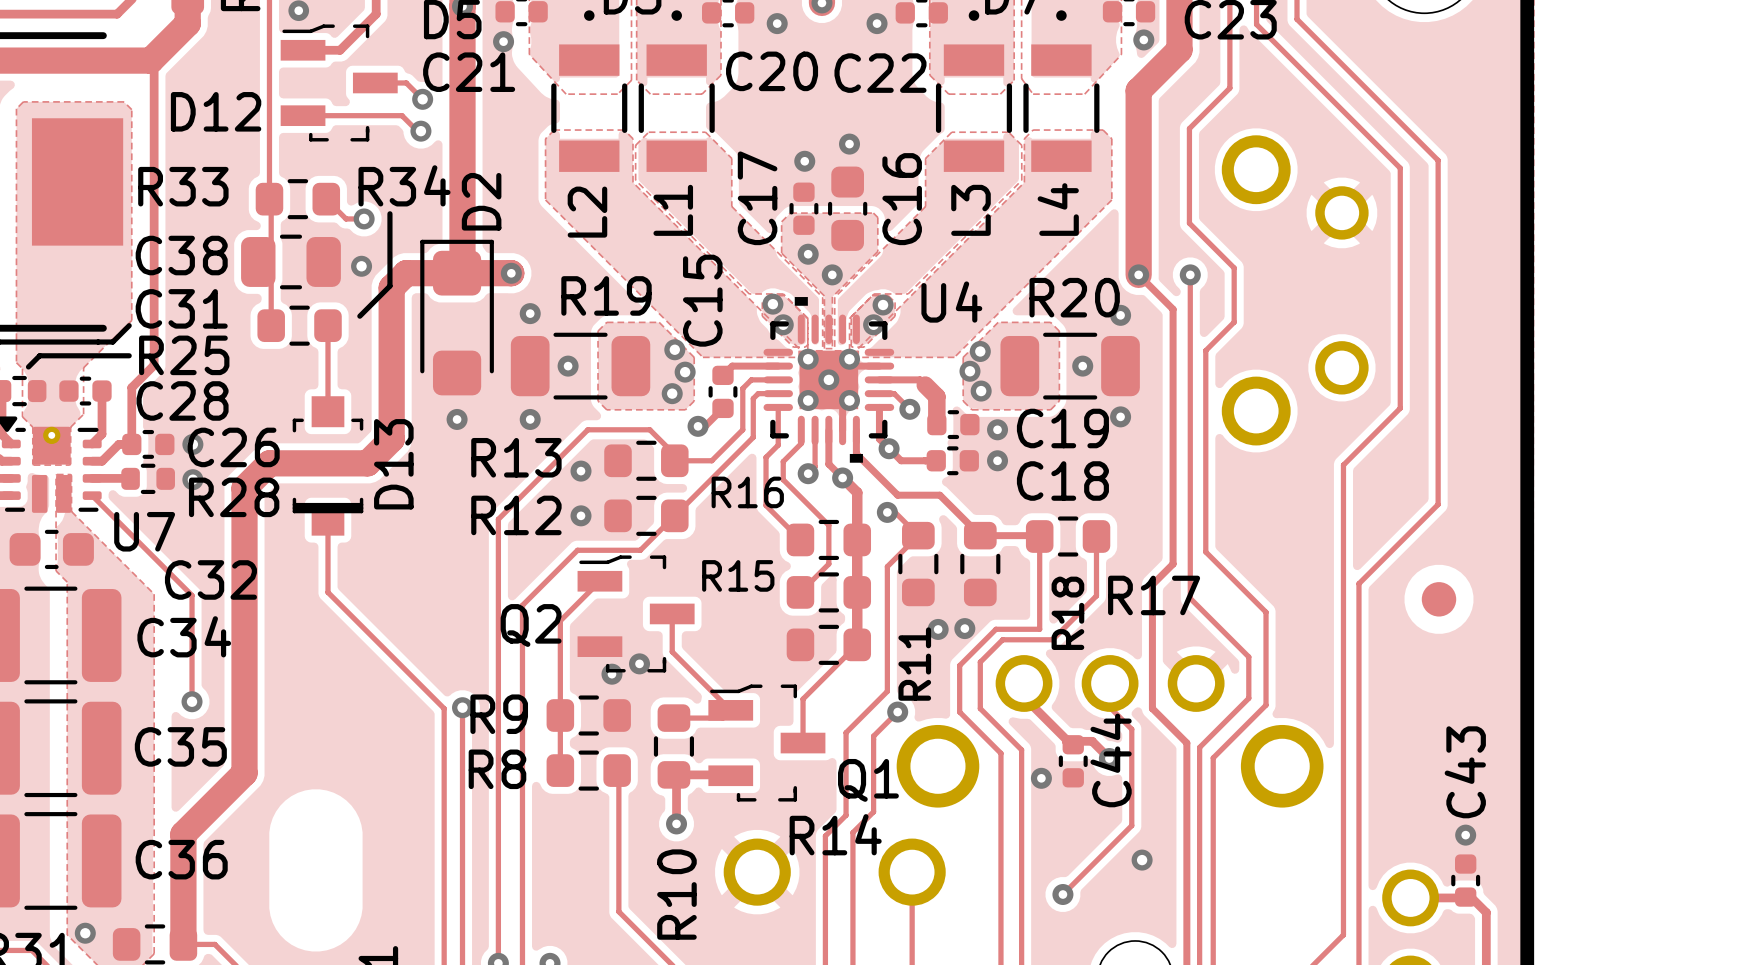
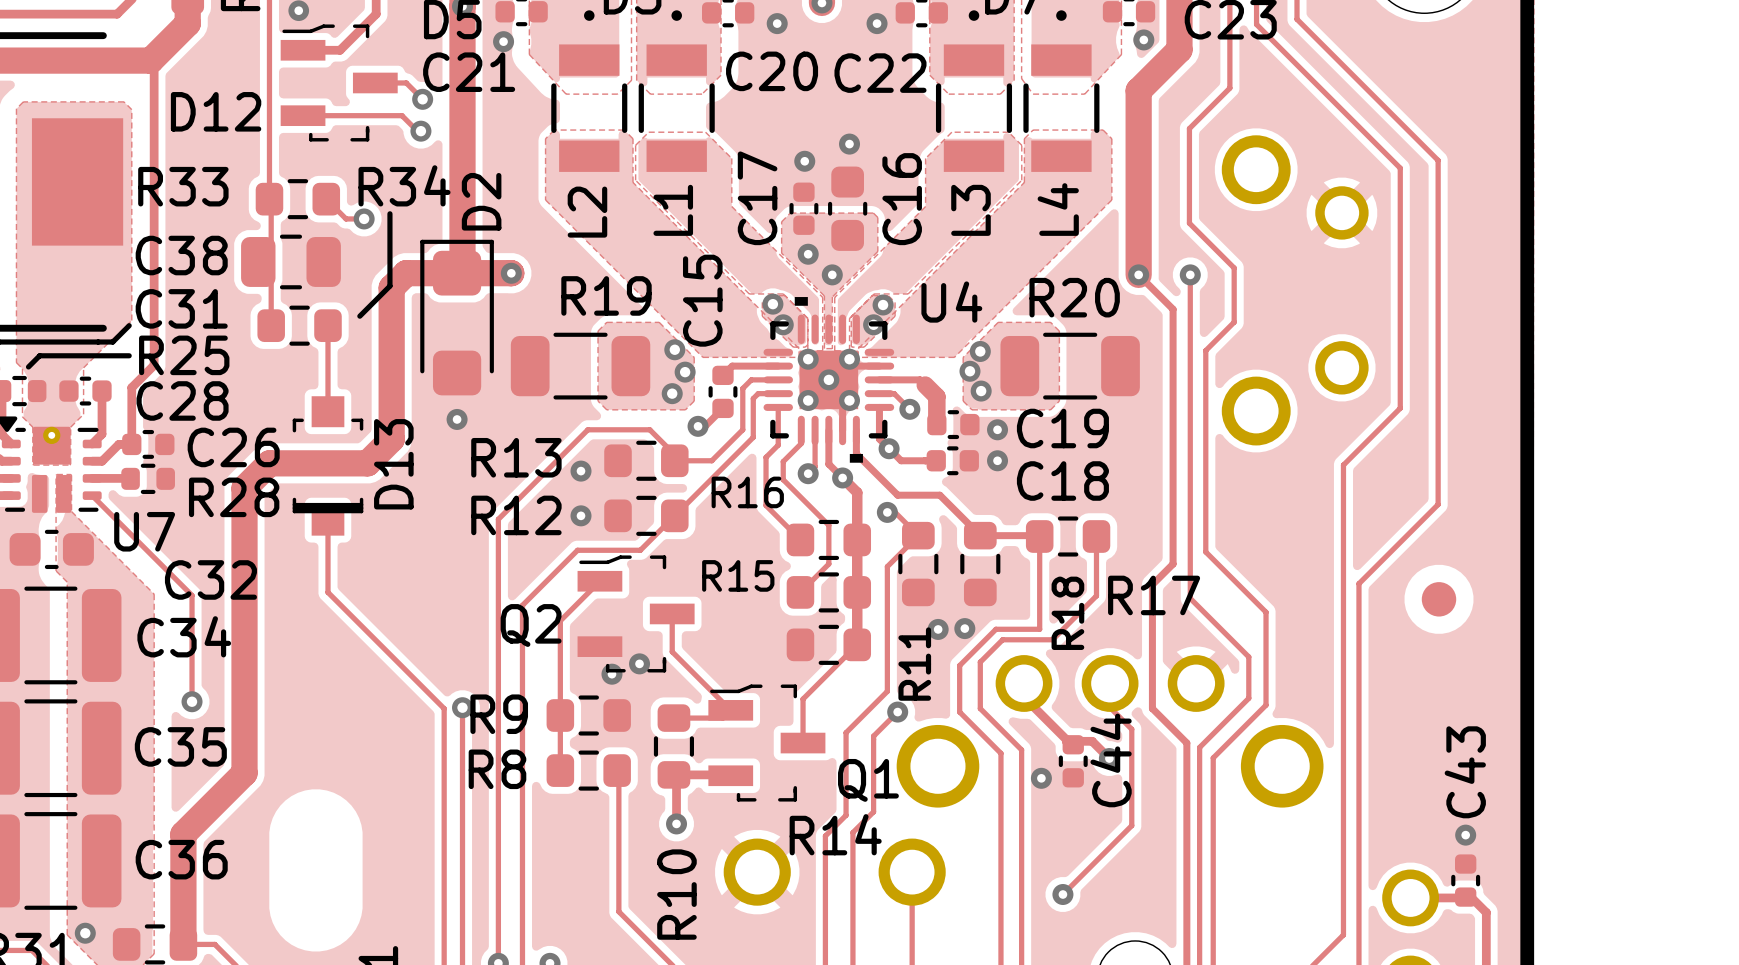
via: (361, 266) -> none
via: (530, 313) -> none
via: (1120, 315) -> none
via: (568, 366) -> none
via: (1082, 366) -> none
via: (1120, 416) -> none
via: (530, 419) -> none
via: (192, 444) -> none
via: (192, 479) -> none
via: (1142, 860) -> none

